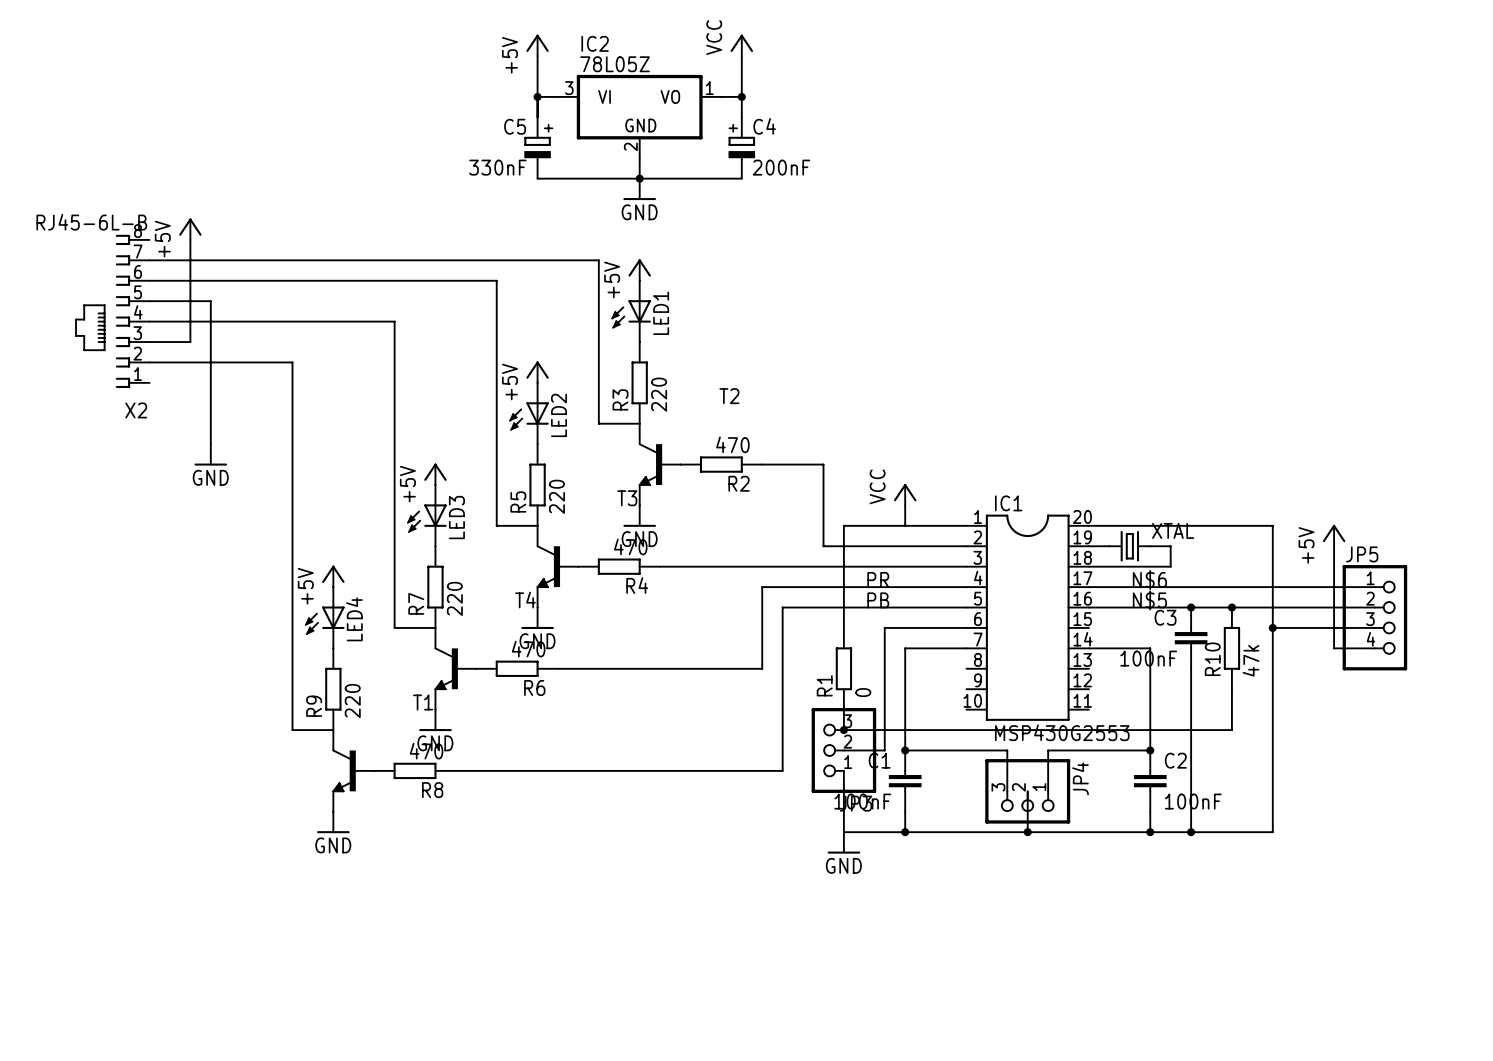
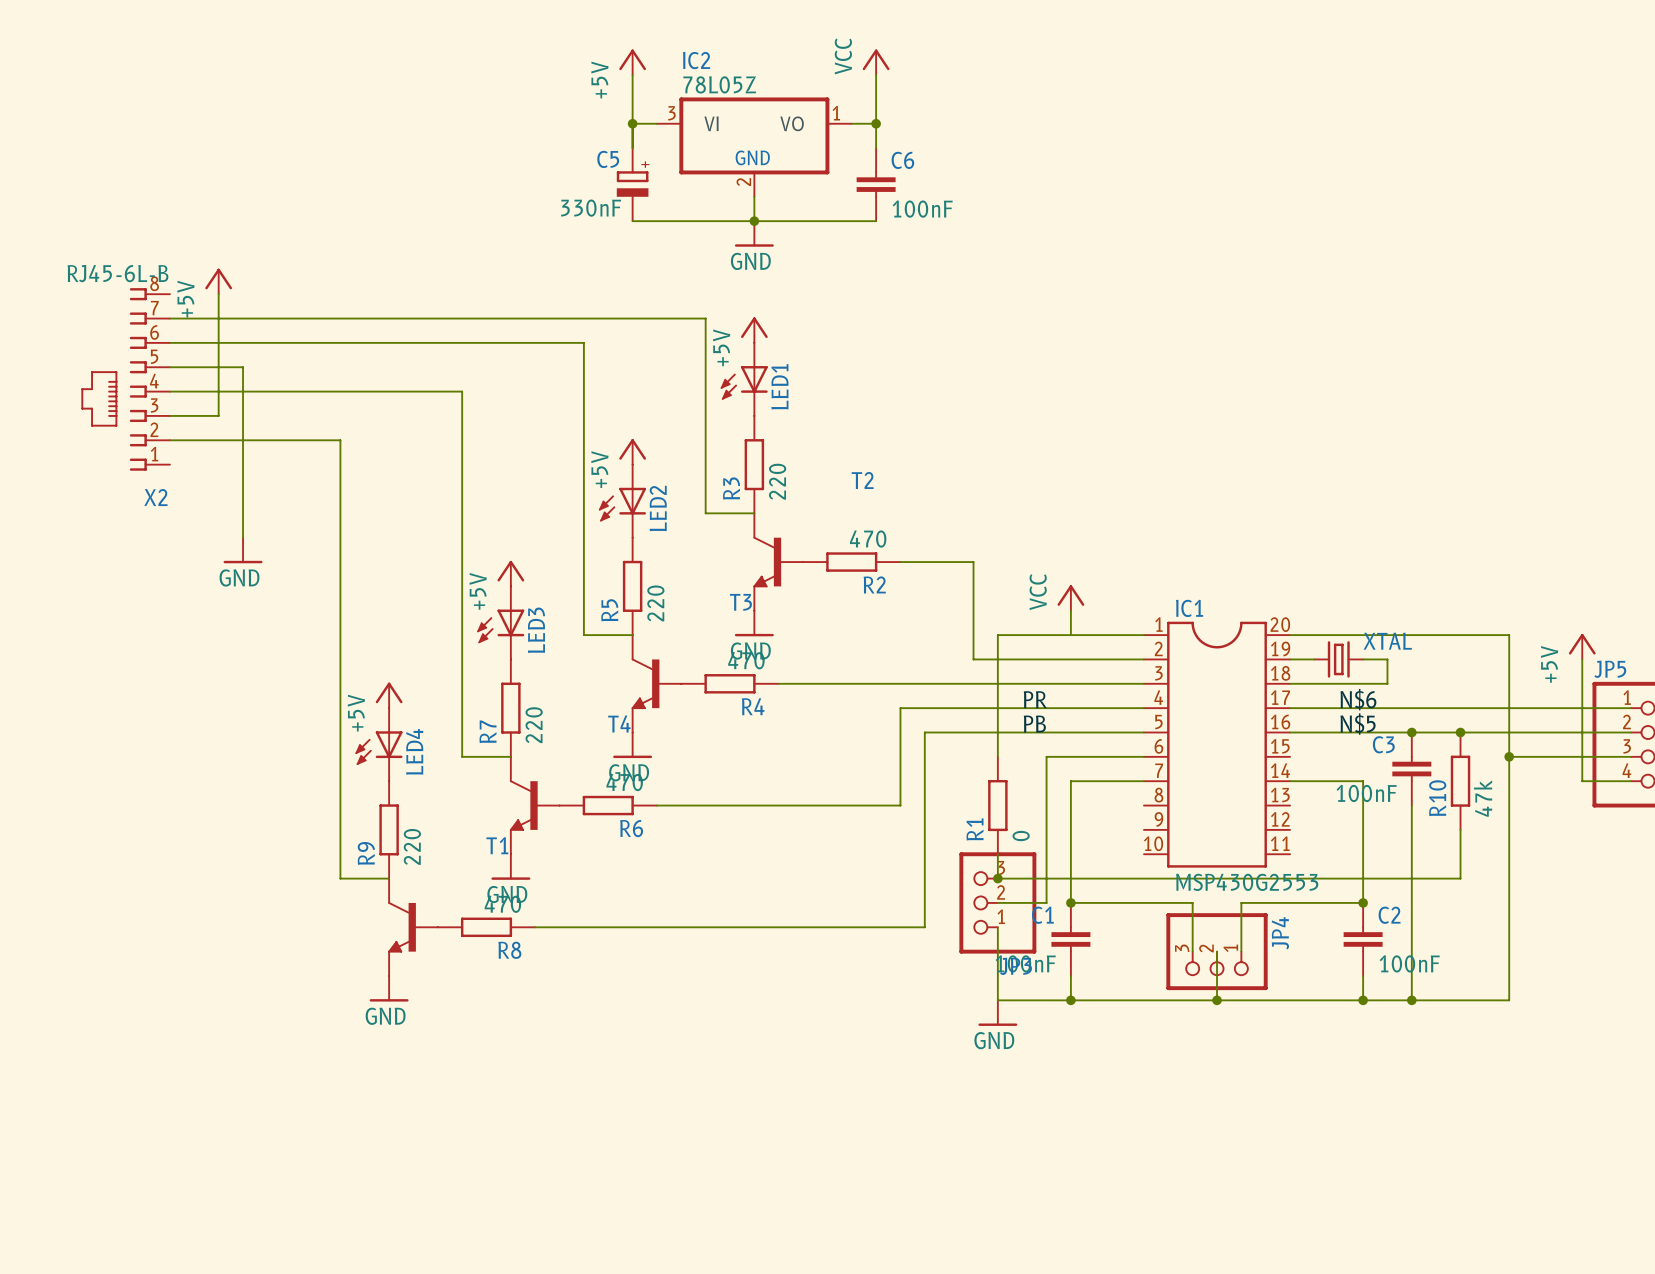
C4: 200nF (741, 148) -> none
C6: none -> 100nF (876, 184)

